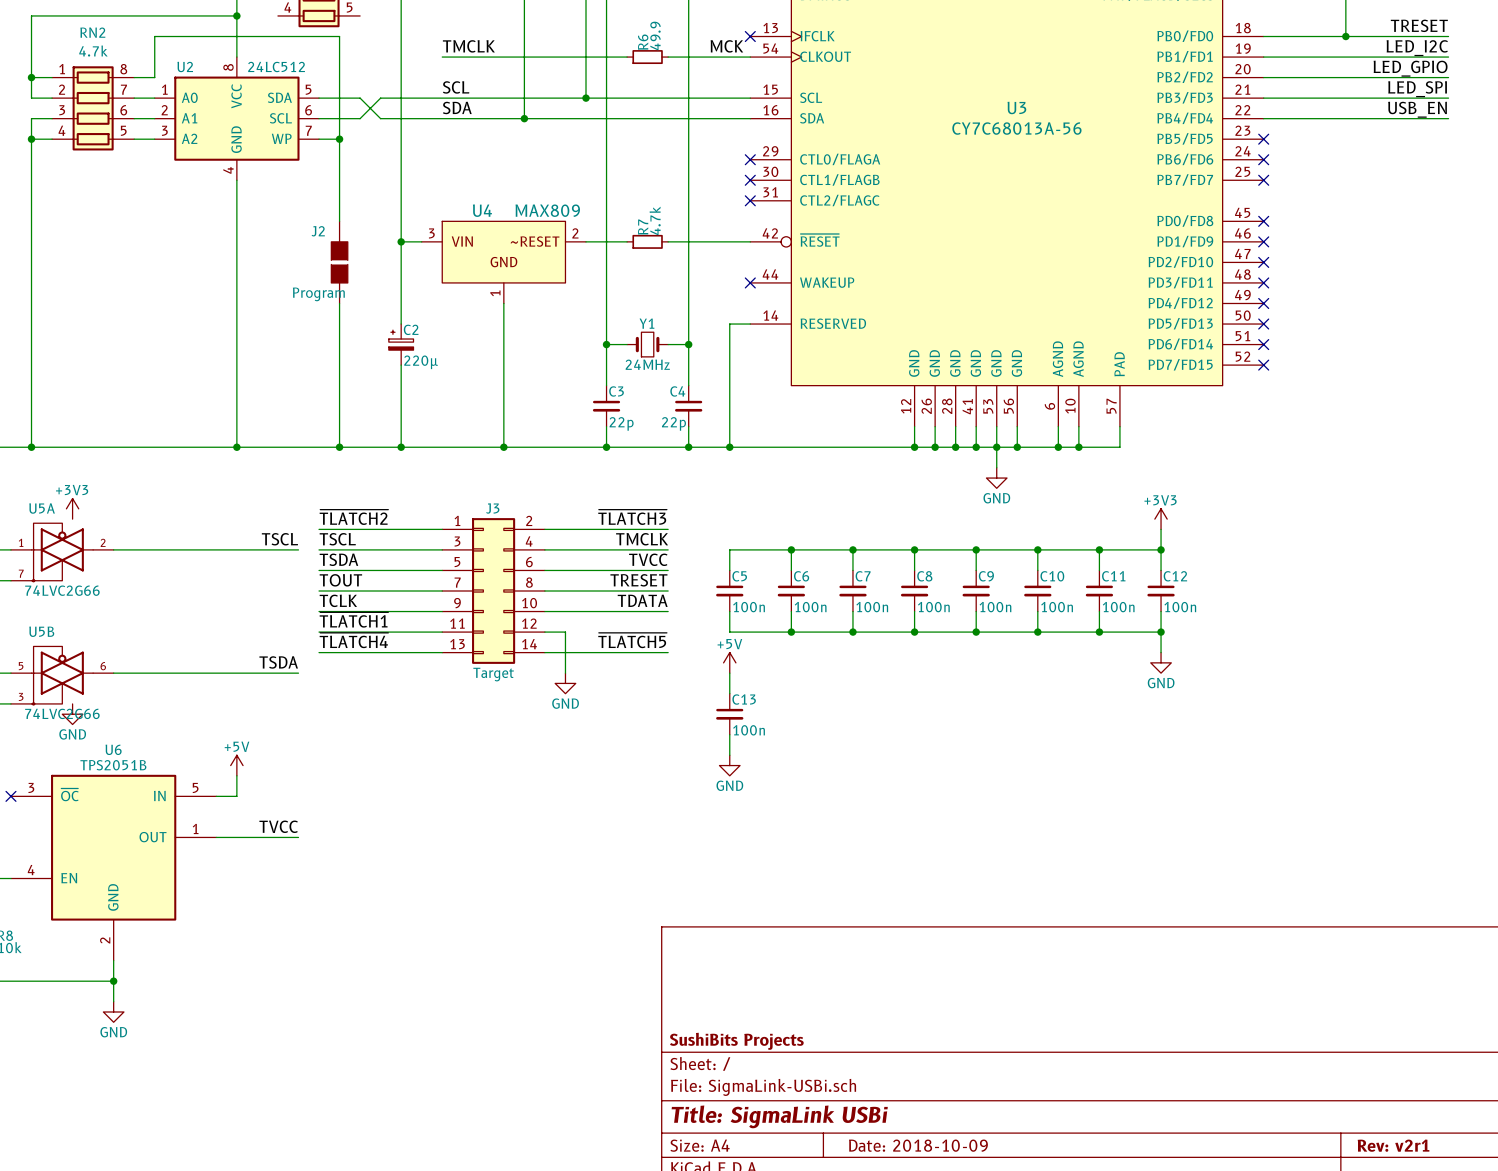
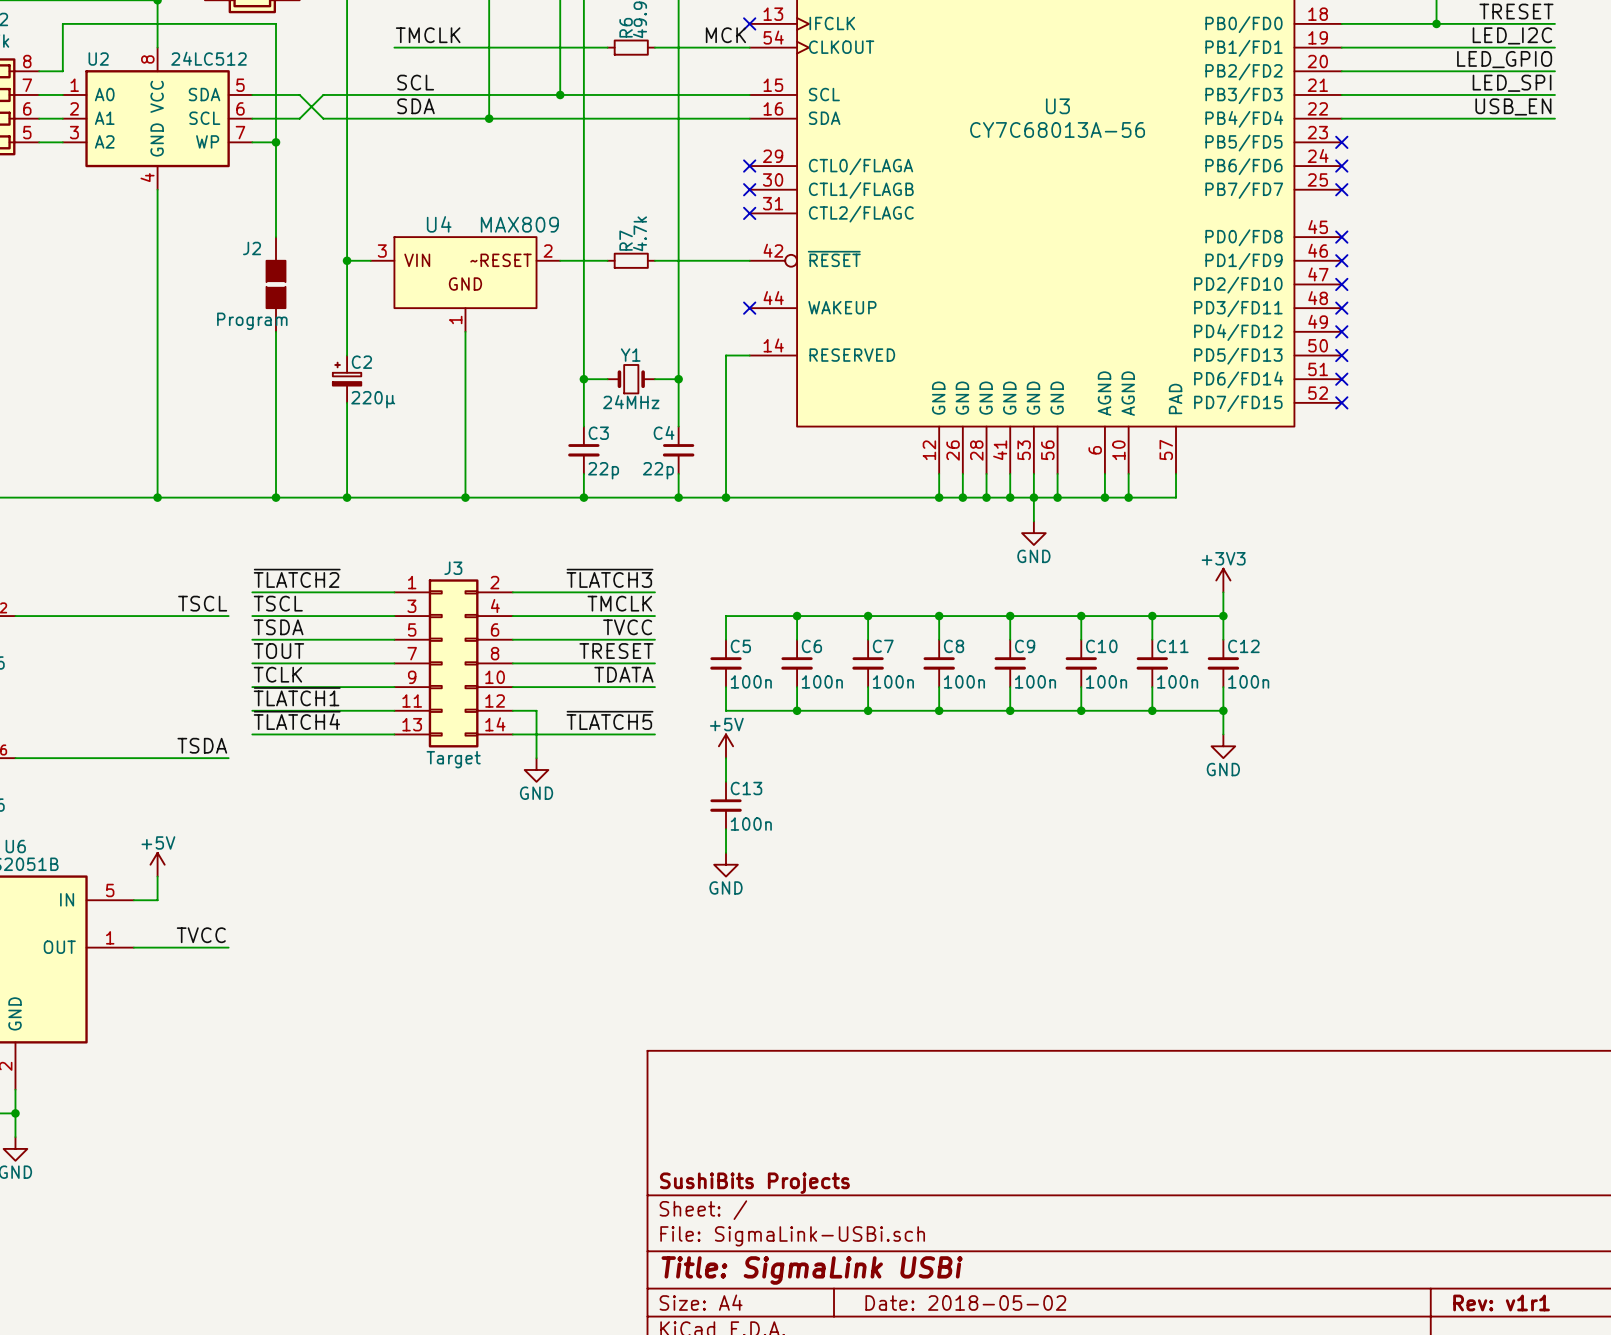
title block: Date: 2018-10-09 (918, 1145) -> Date: 2018-05-02 (965, 1302)
title block: Rev: v2r1 (1393, 1145) -> Rev: v1r1 (1501, 1302)

